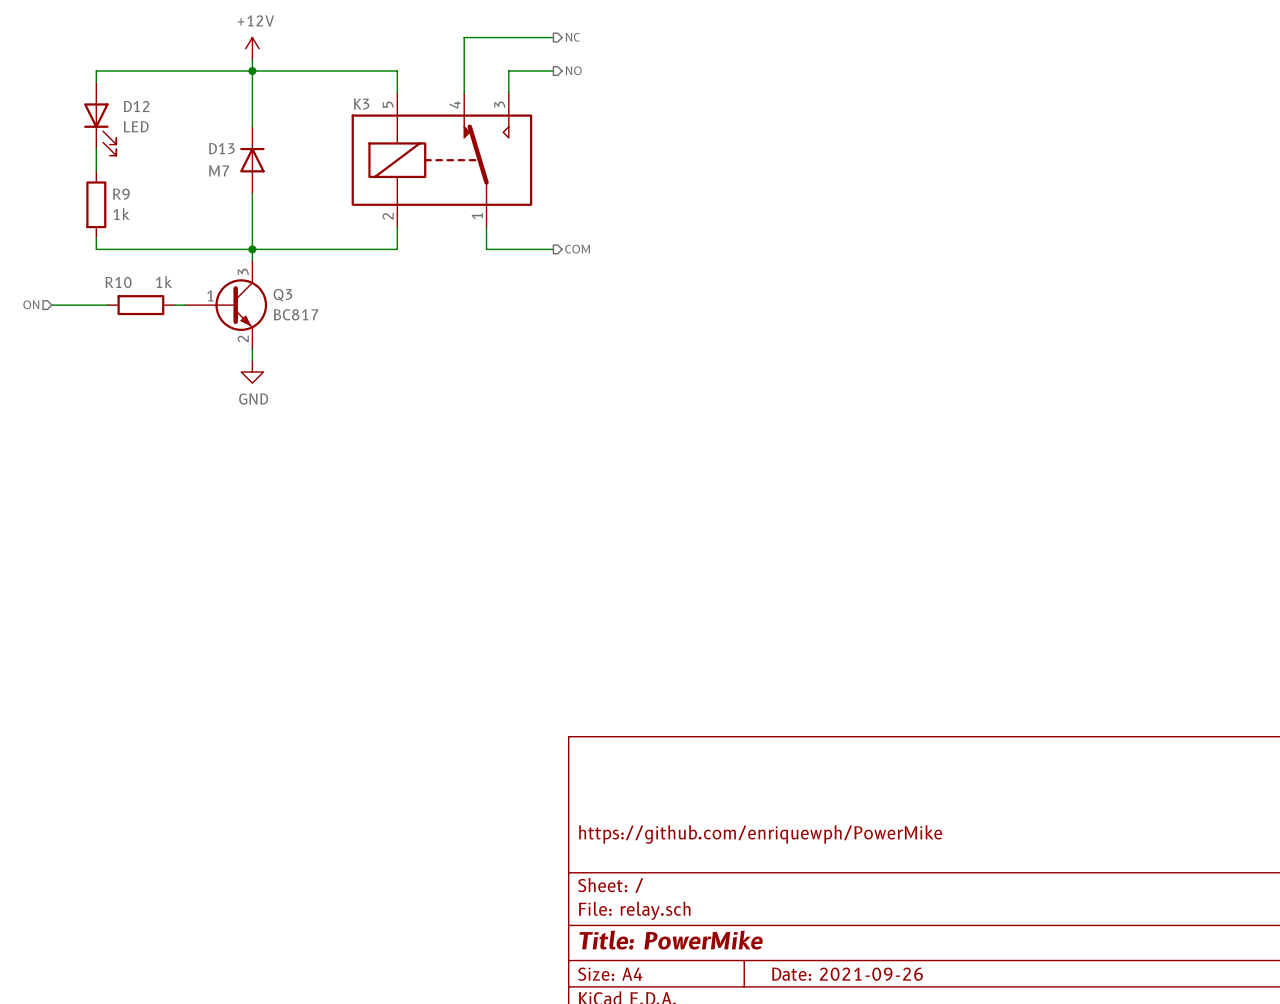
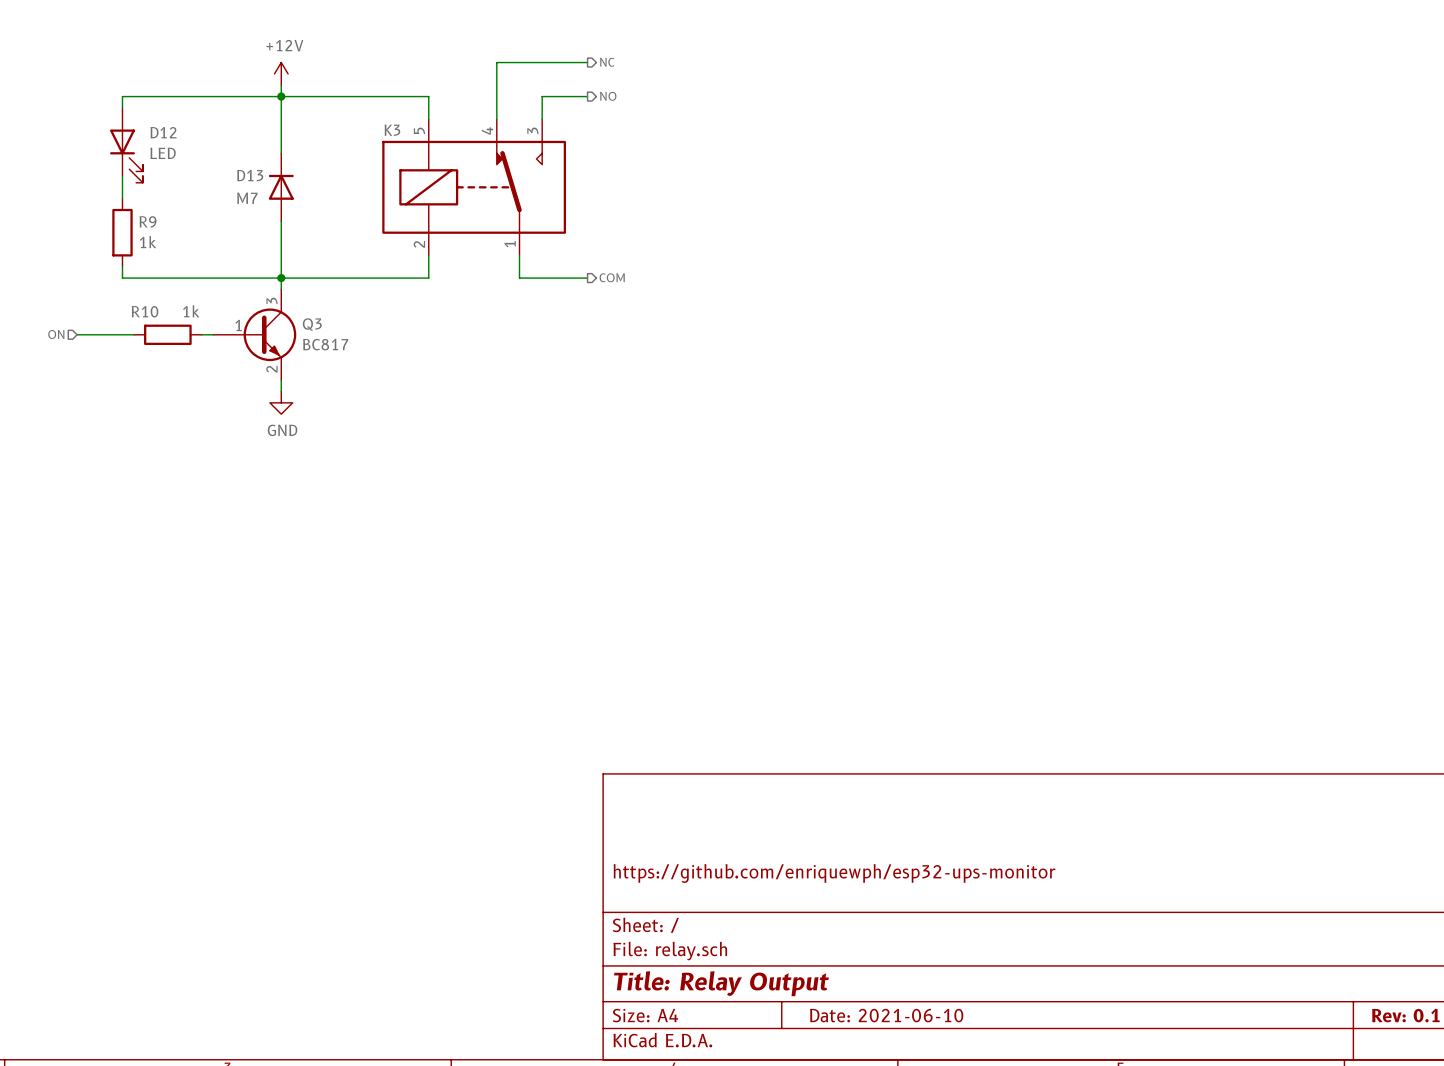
title block: https://github.com/enriquewph/PowerMike (760, 834) -> https://github.com/enriquewph/esp32-ups-monitor (834, 873)
title block: Title: PowerMike (671, 940) -> Title: Relay Output (721, 983)
title block: Date: 2021-09-26 (847, 974) -> Date: 2021-06-10 (886, 1015)

